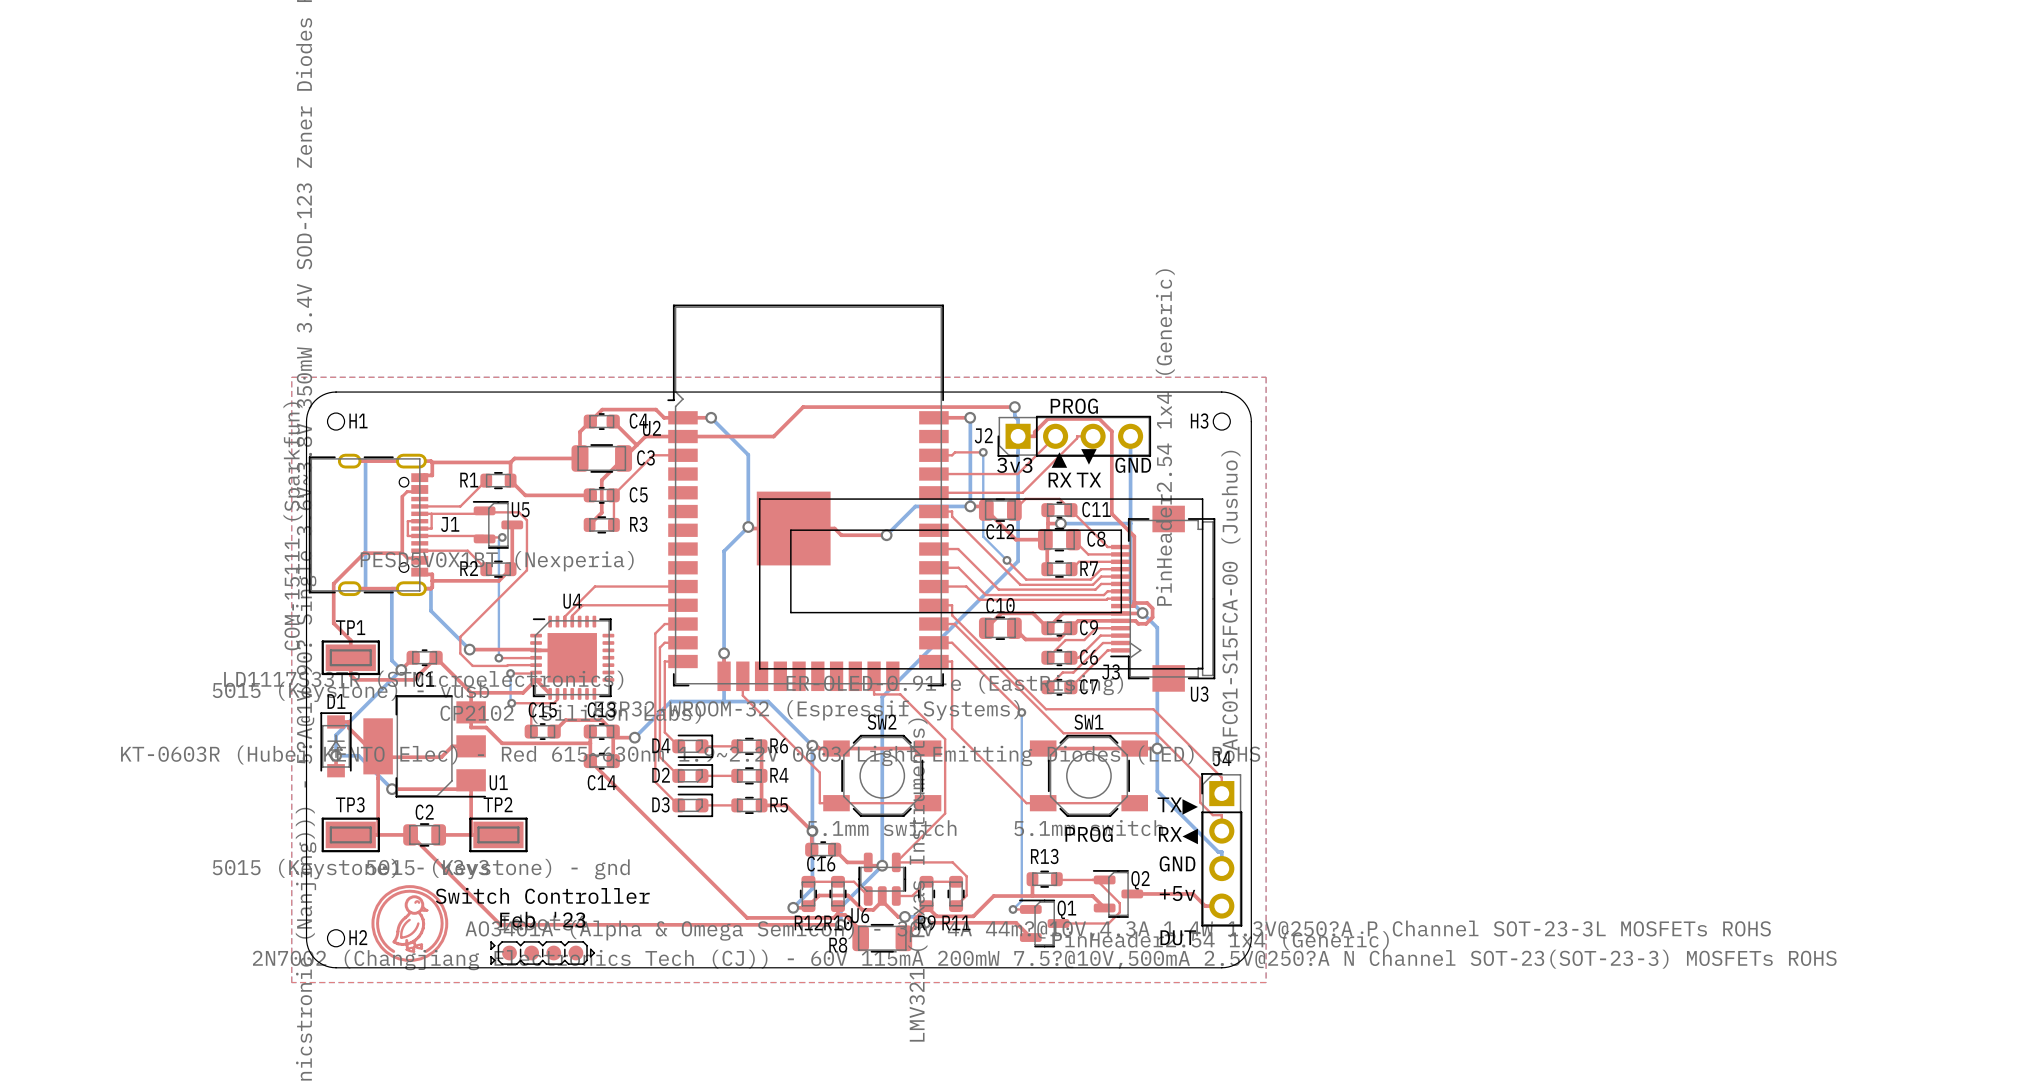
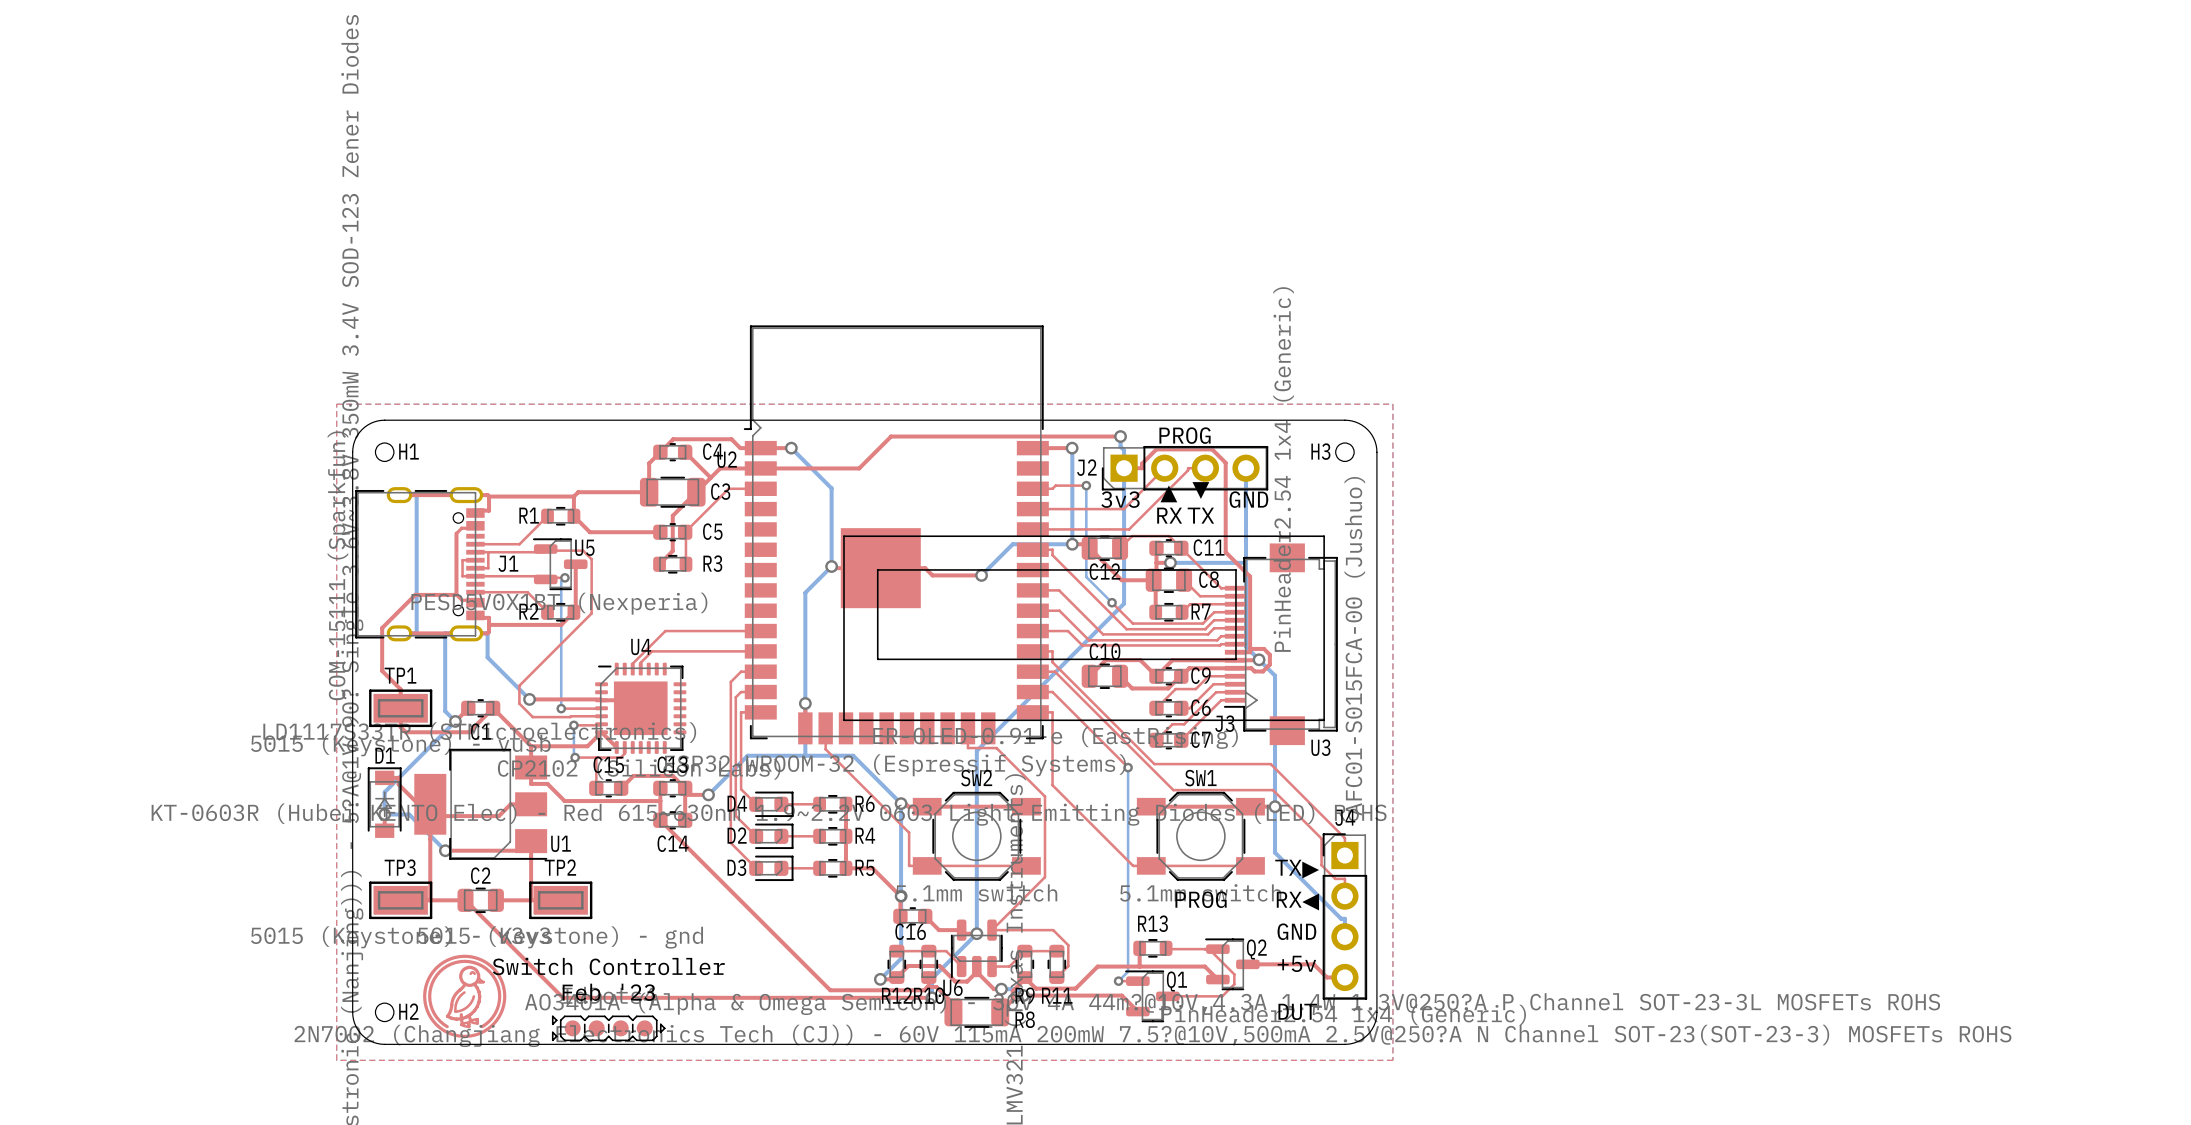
J3 value: AFC01-S15FCA-00 (Jushuo) (1230, 600) -> AFC01-S015FCA-00 (Jushuo) (1354, 646)
R8 name position: R8 (838, 945) -> R8 (1025, 1019)

